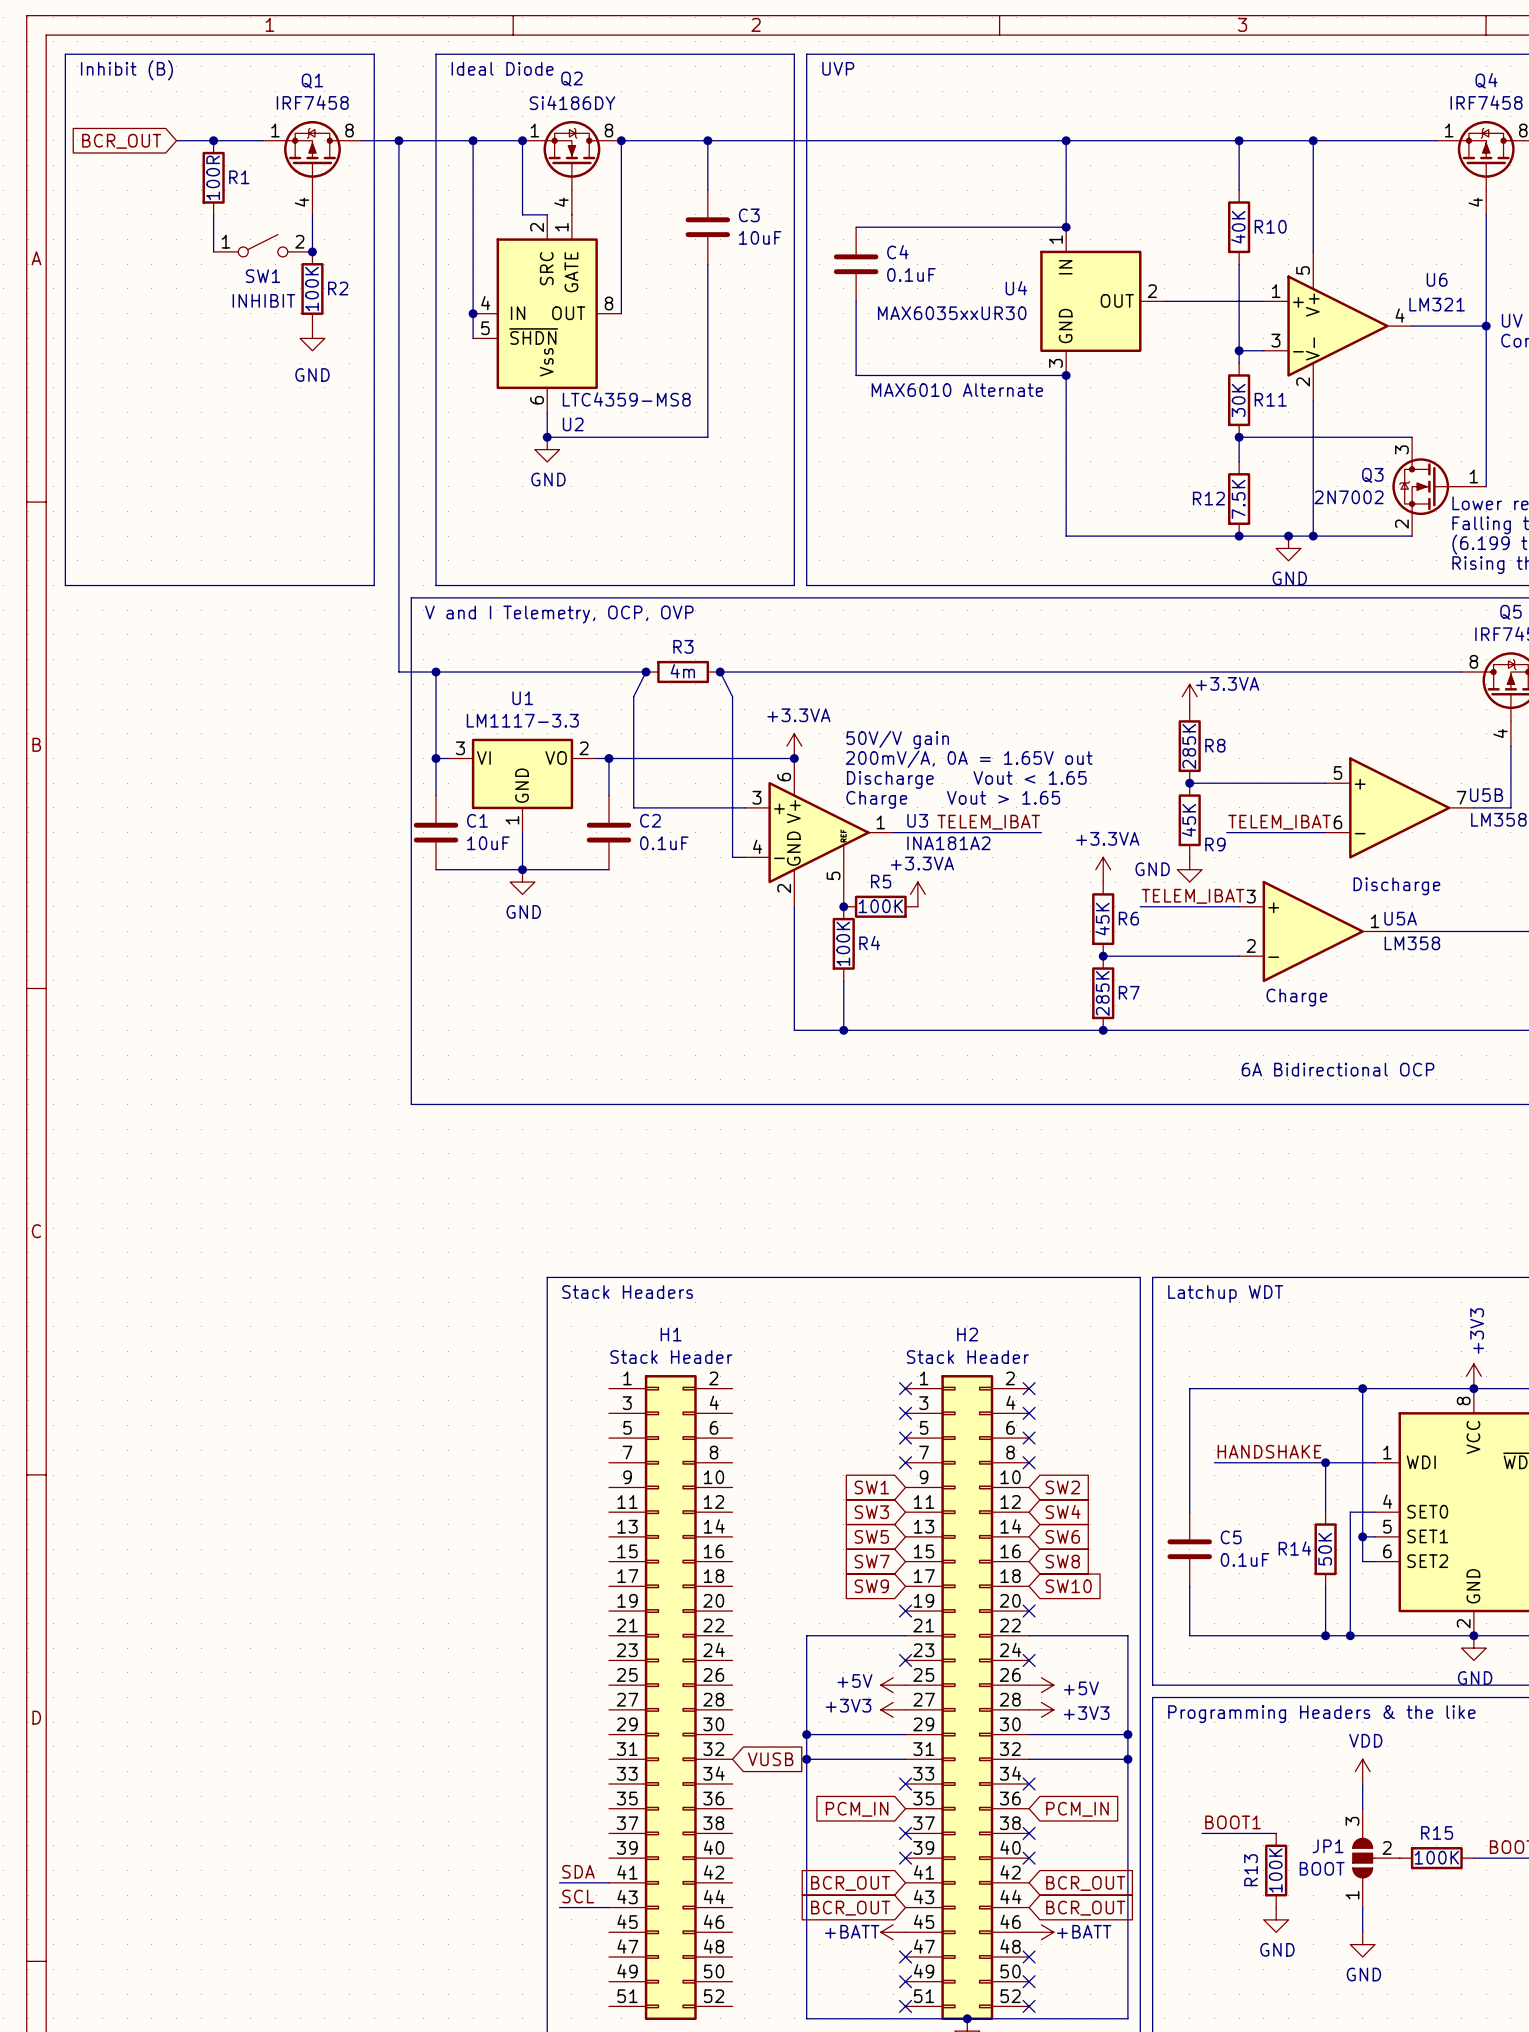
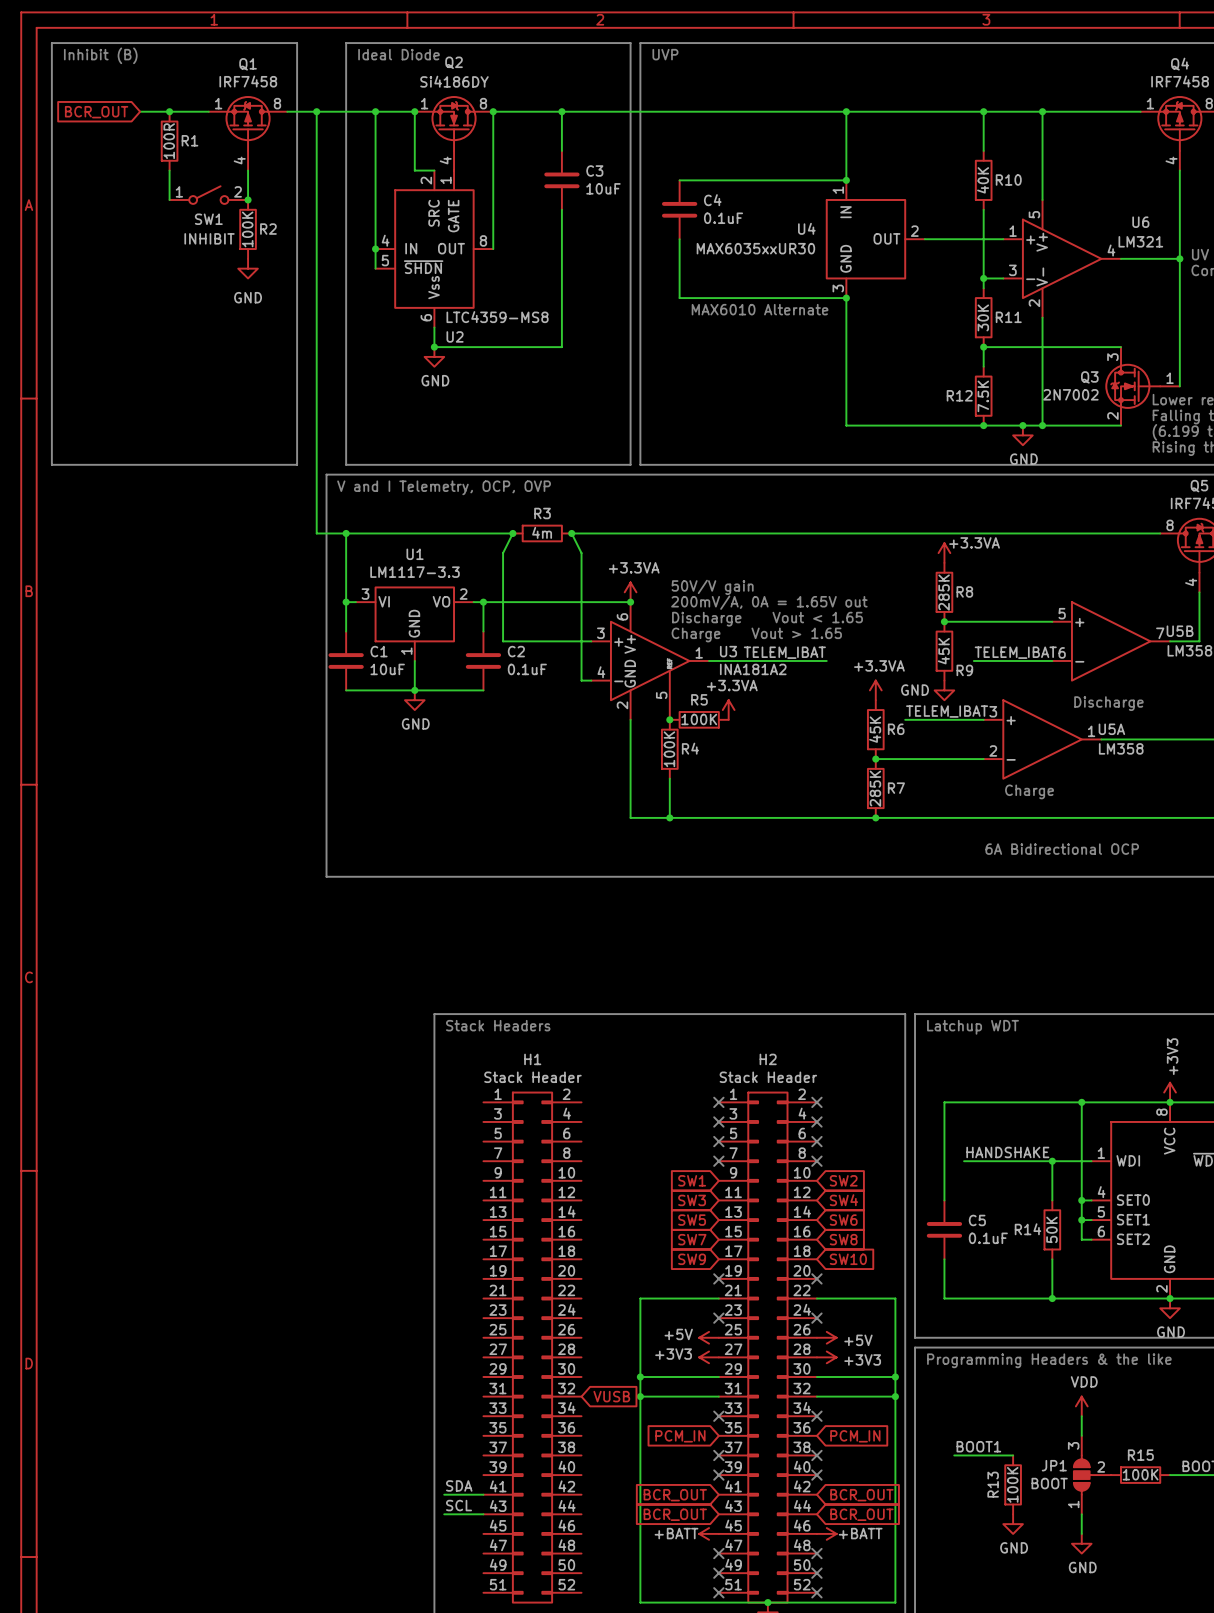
wire: (1362, 1512) (1350, 1512) (1350, 1635) -> none
junction: none -> (1081, 1200)
junction: (1350, 1635) -> none

